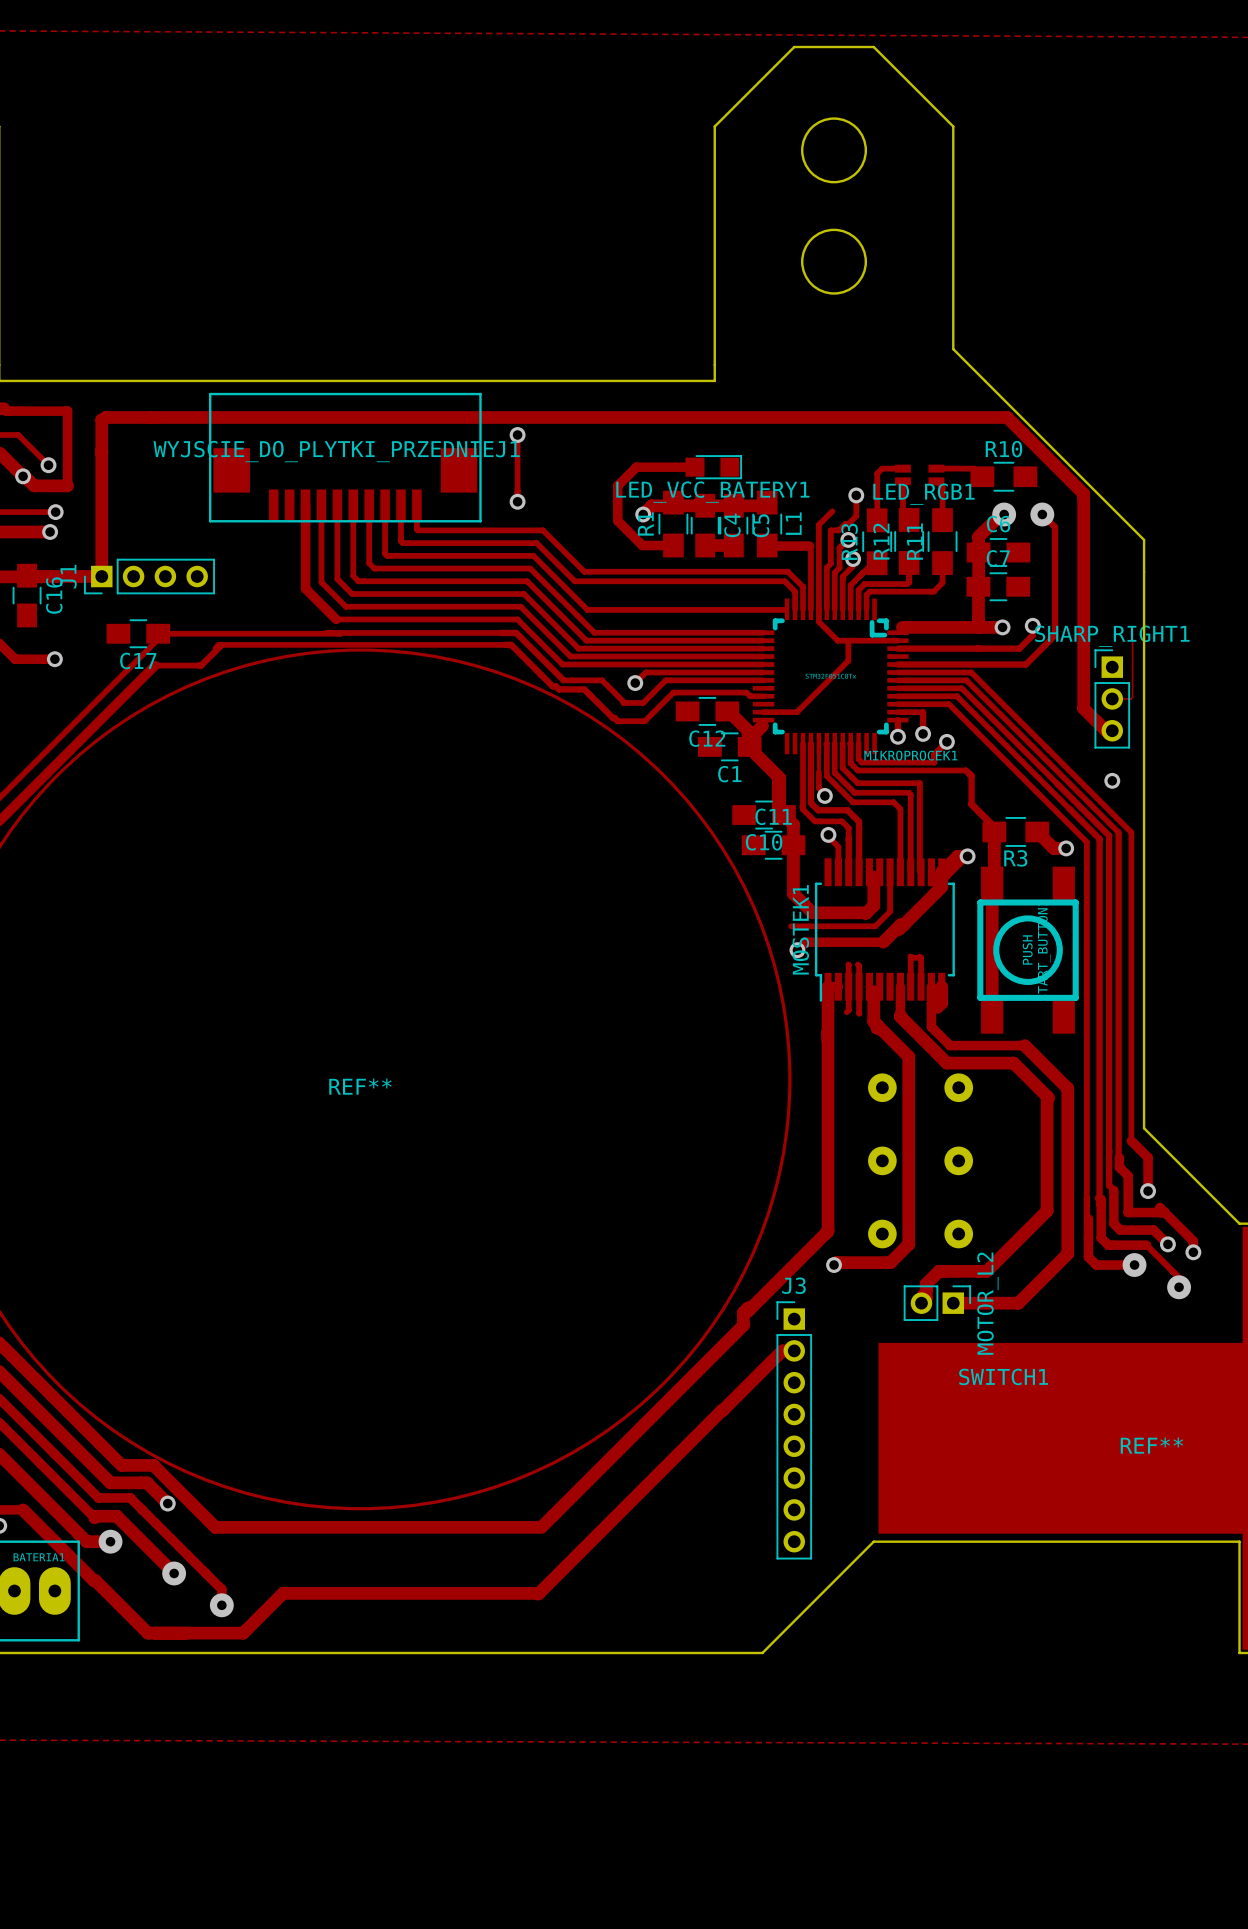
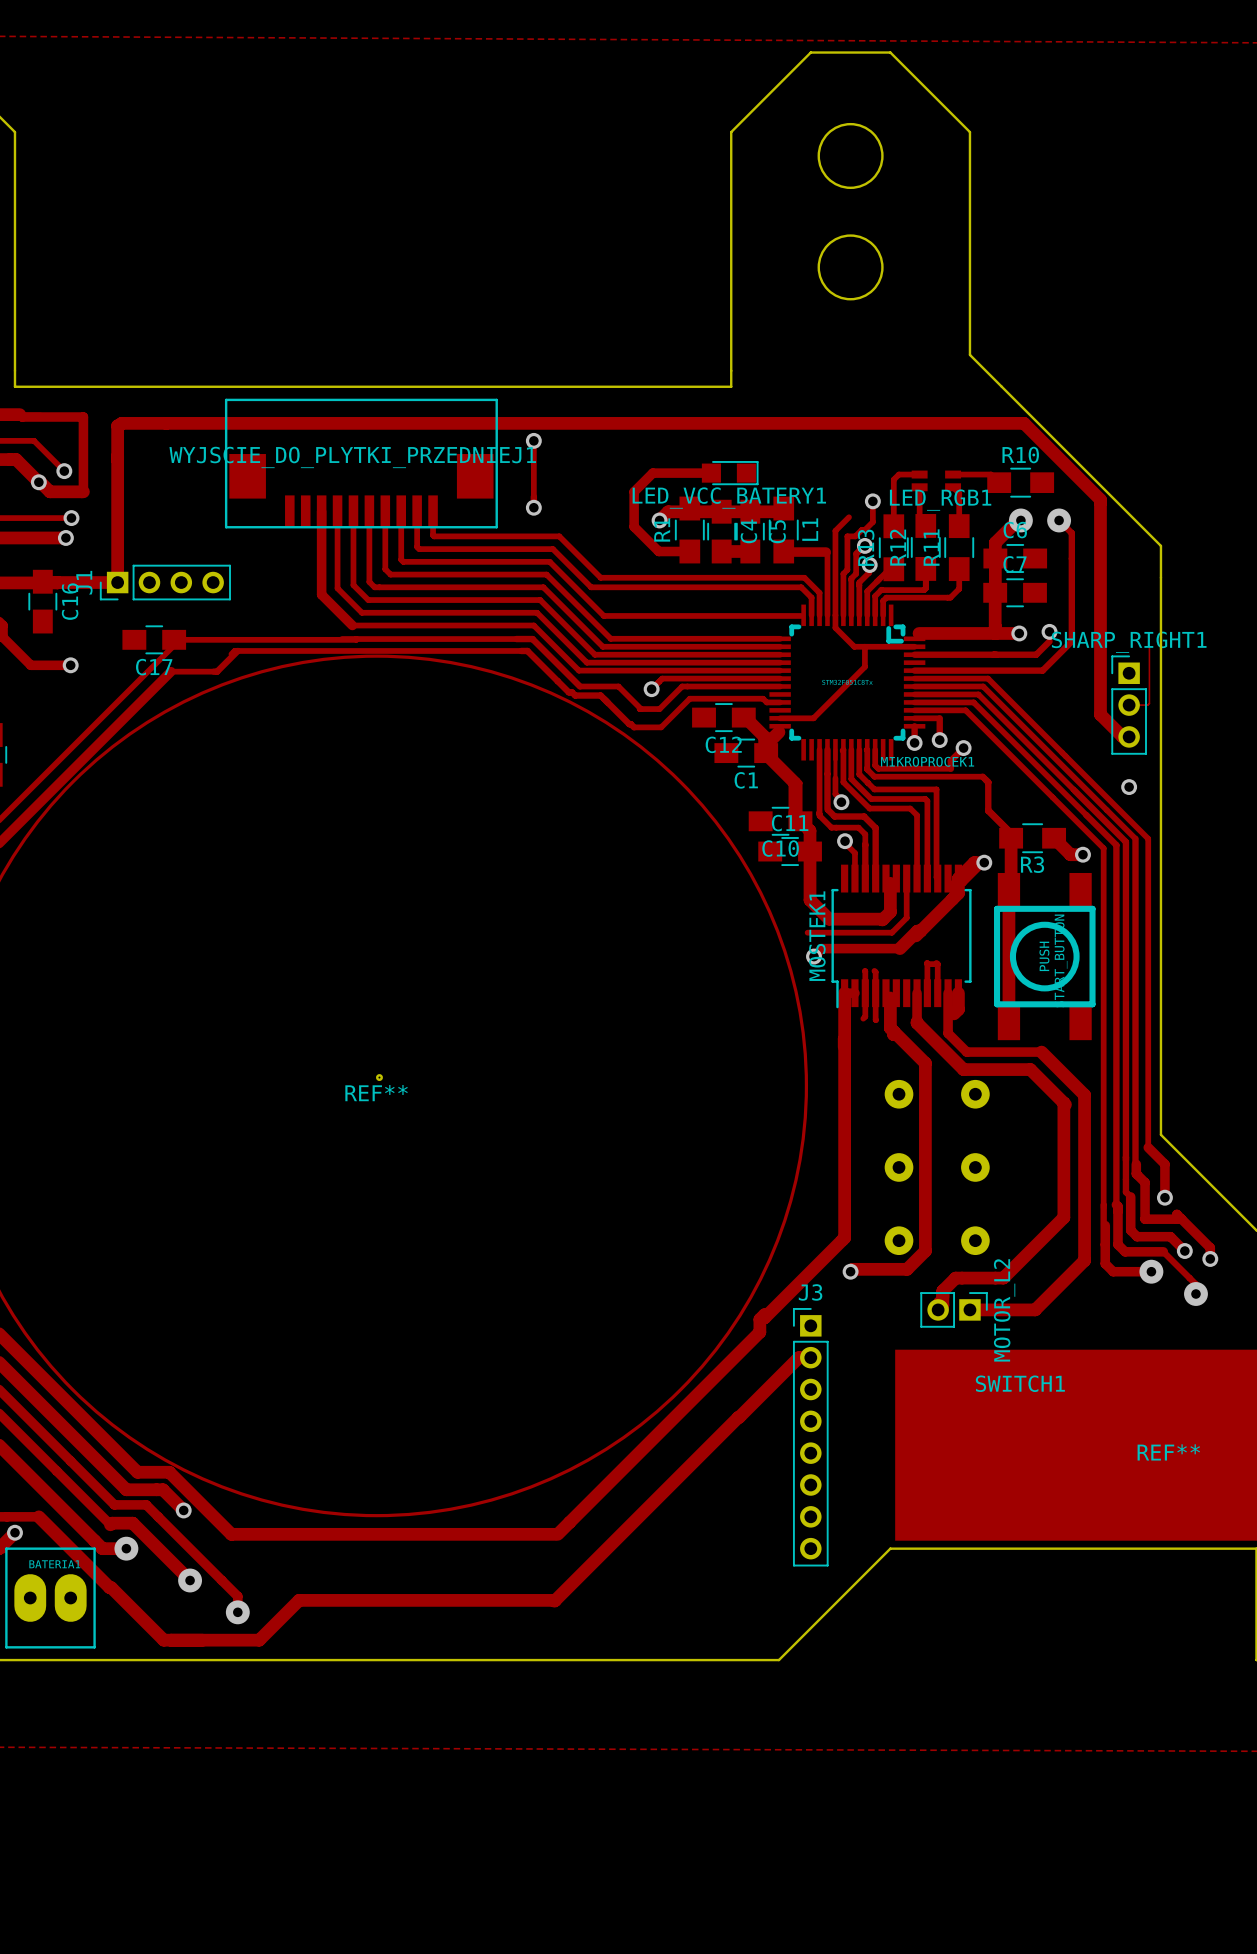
round board edge: none -> [376, 1074, 383, 1081]

